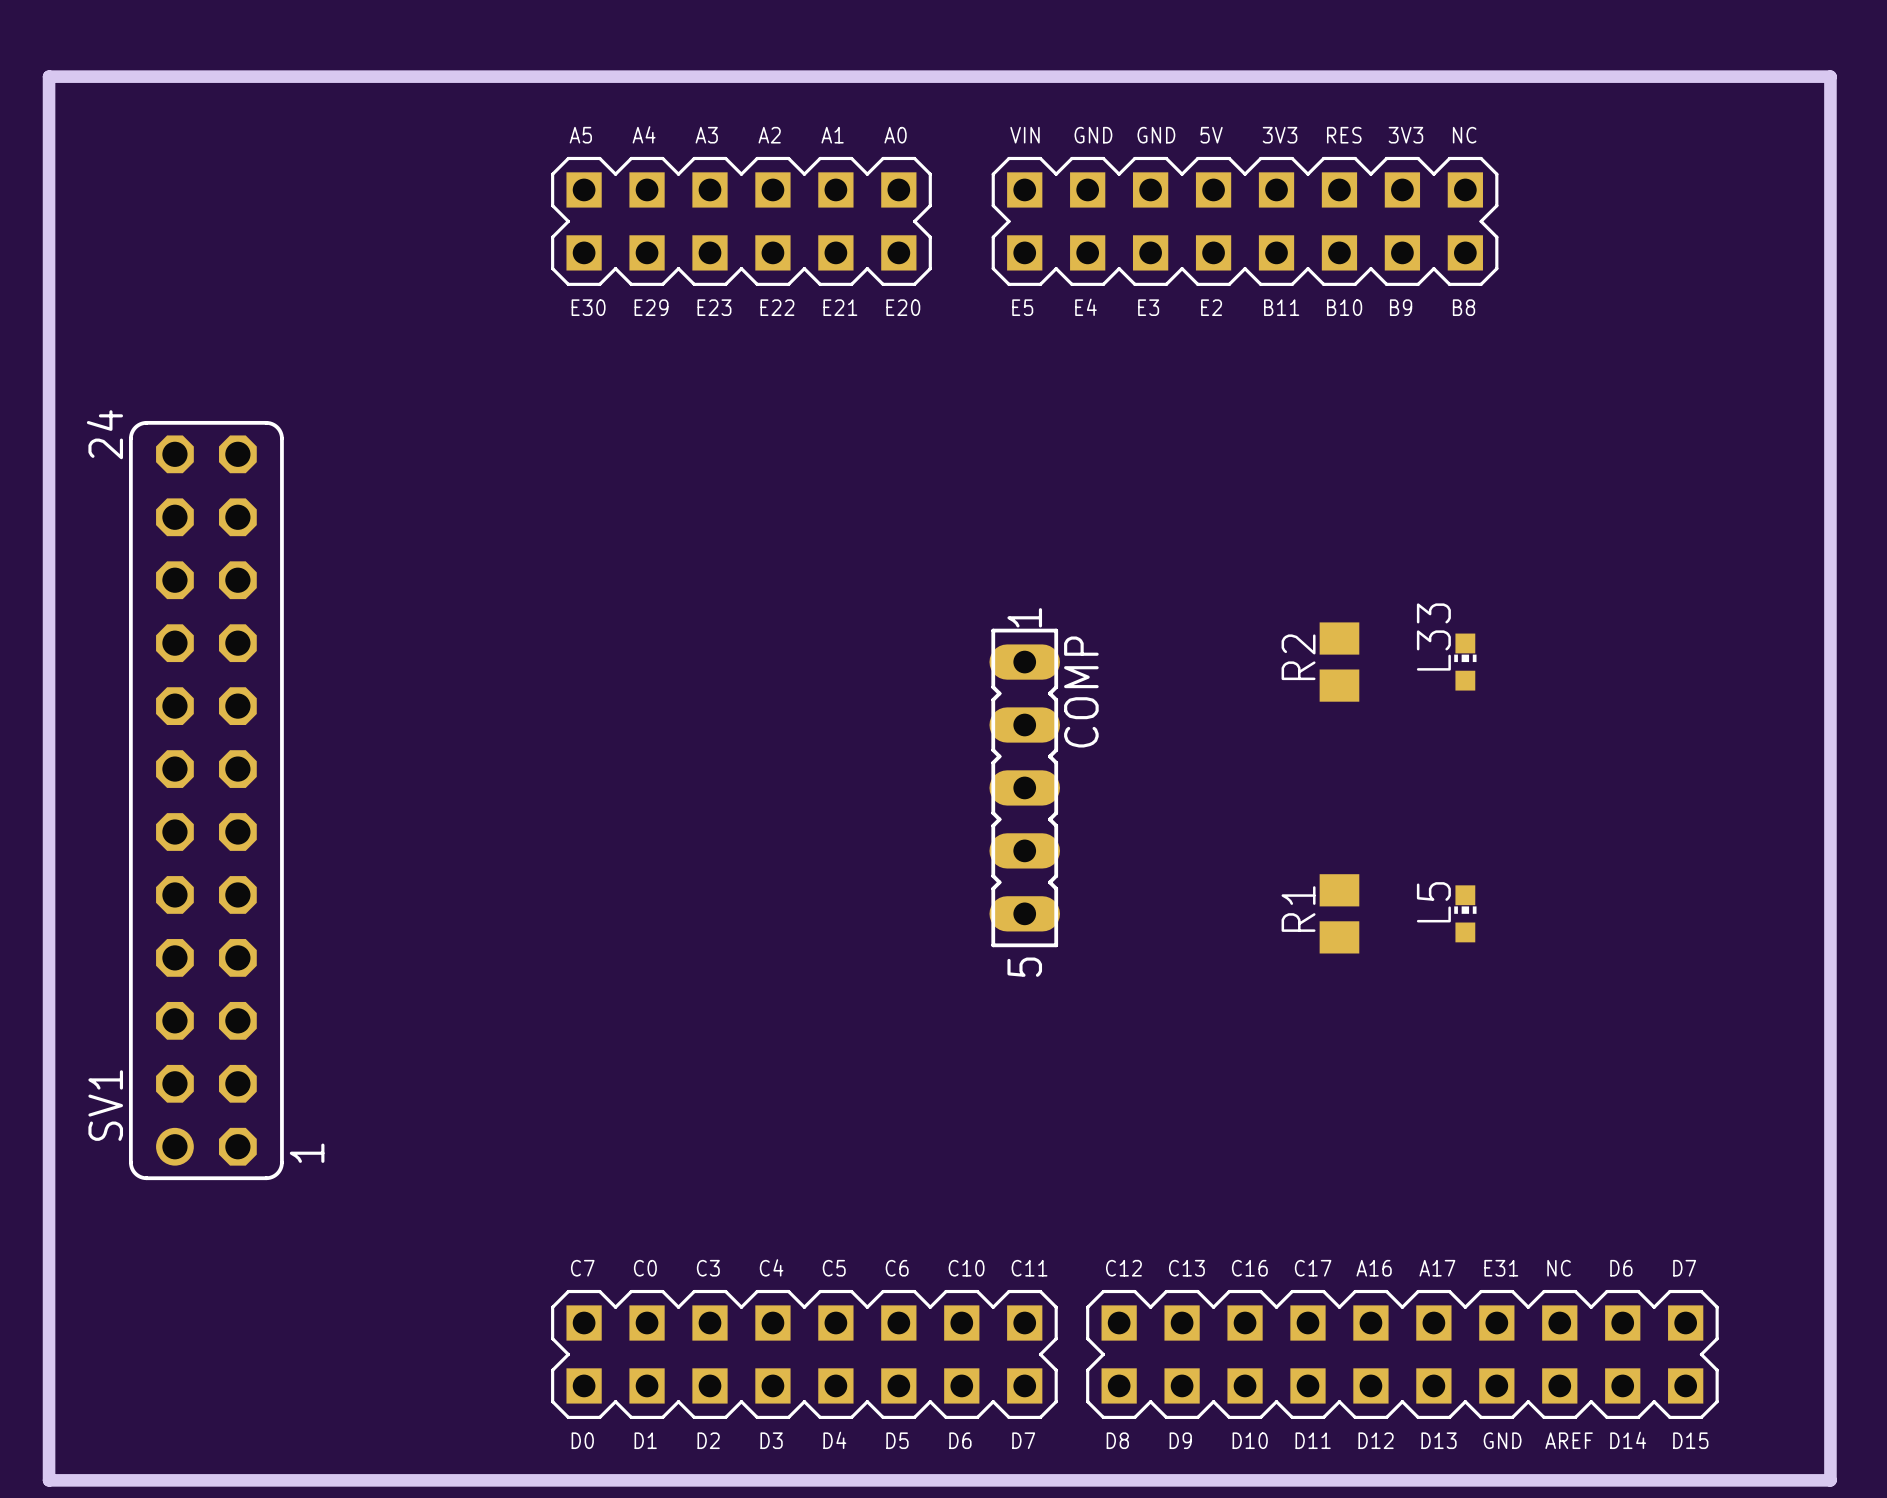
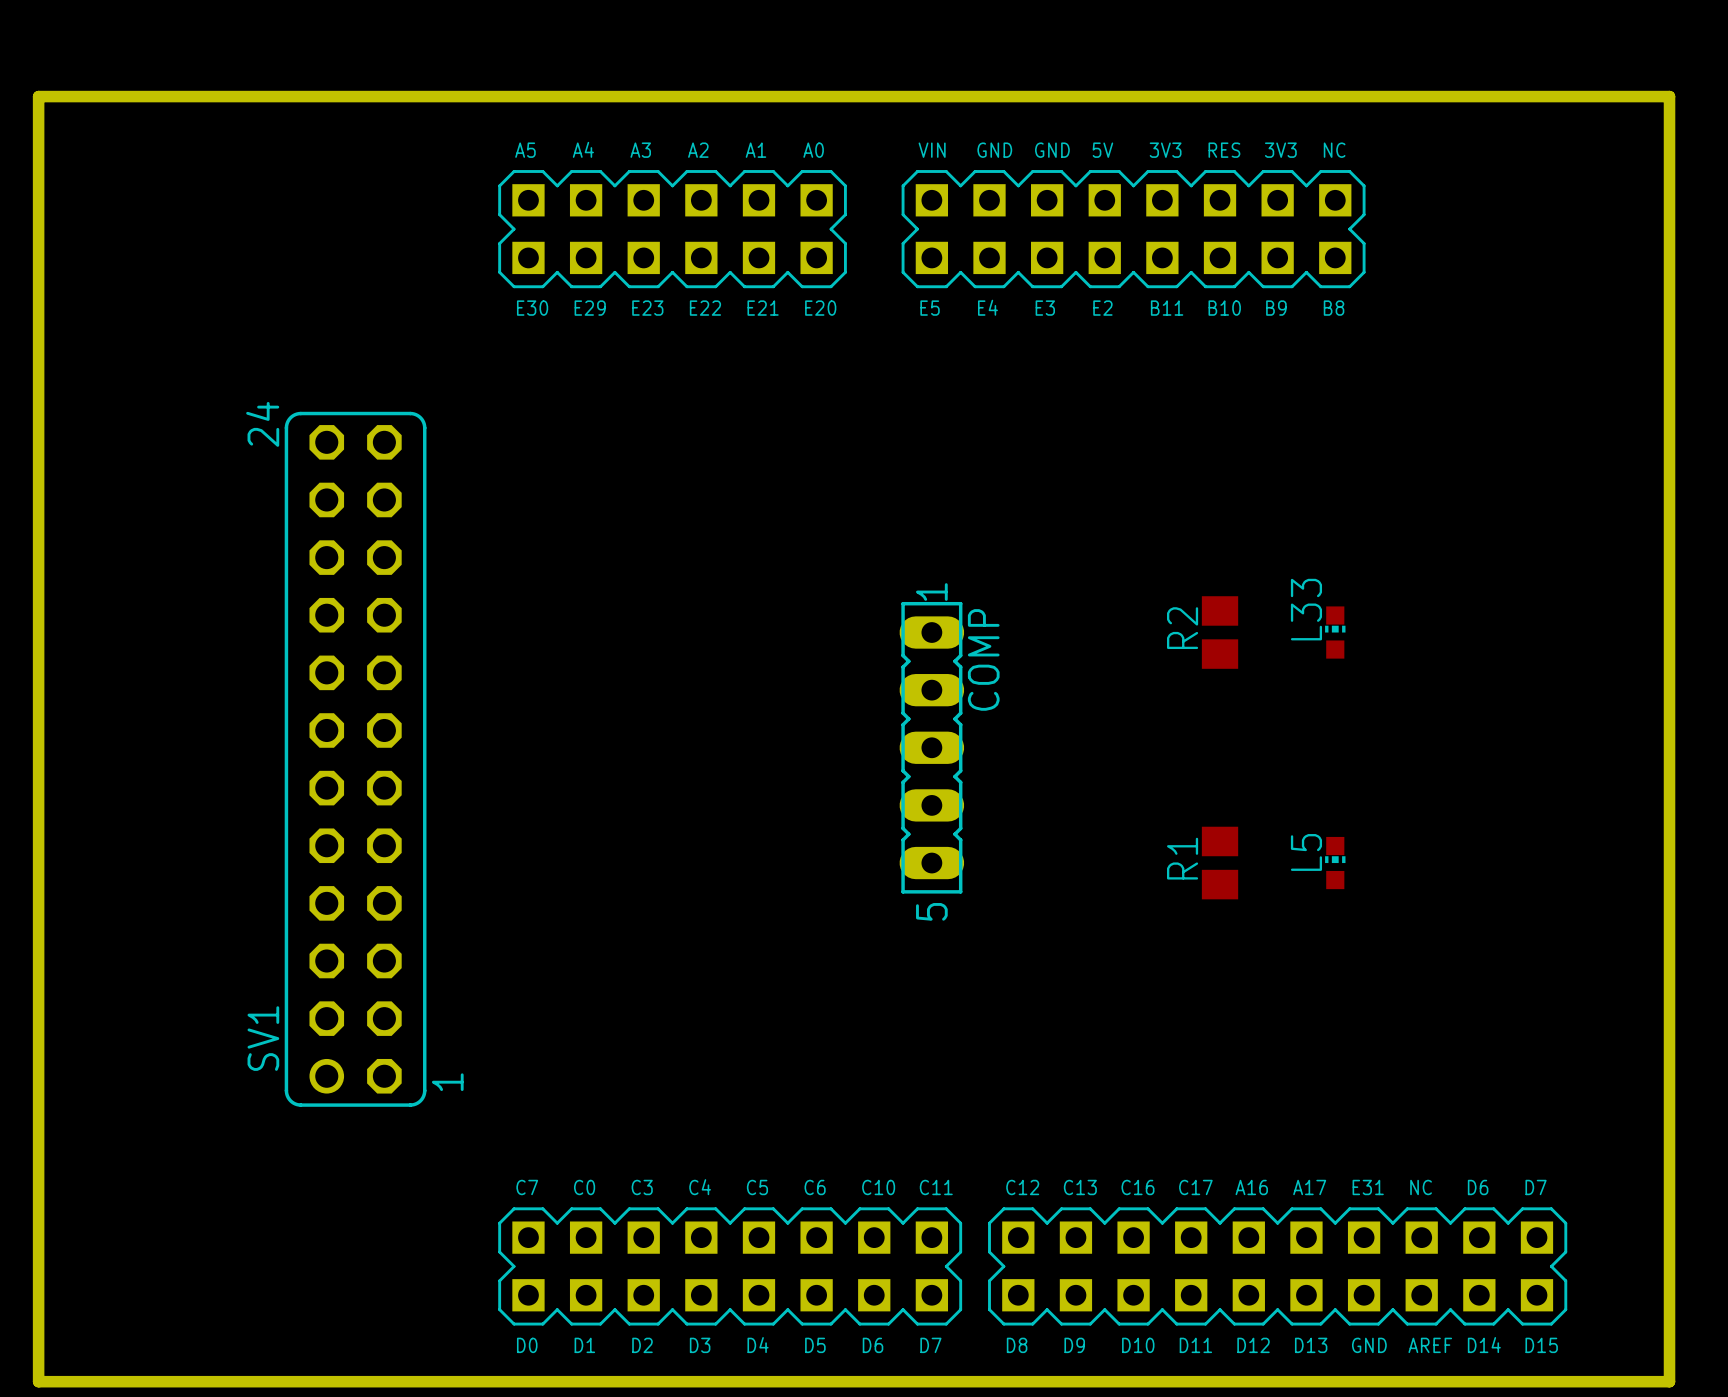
SV1 position: (206, 800) -> (355, 759)

